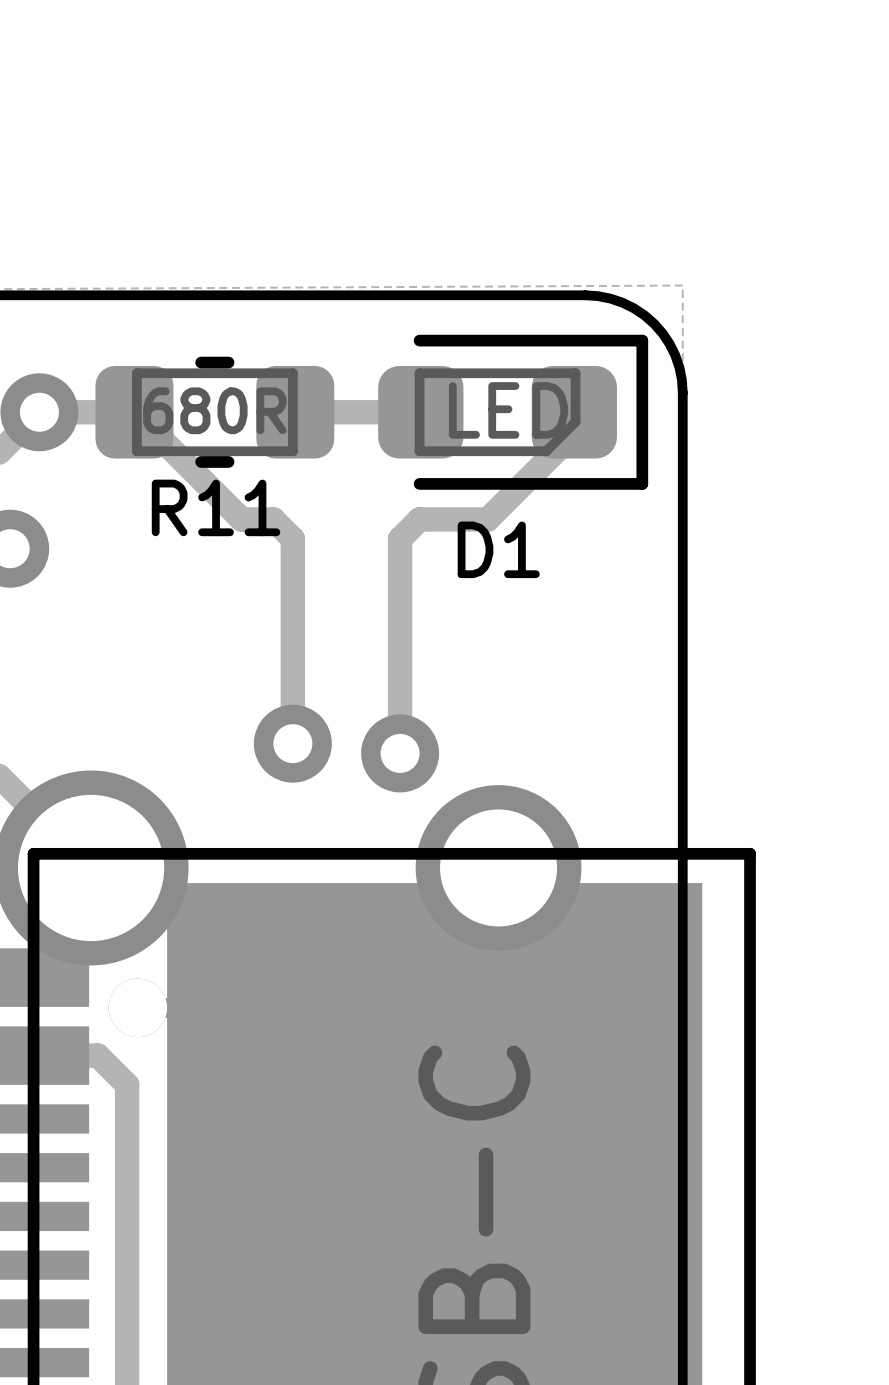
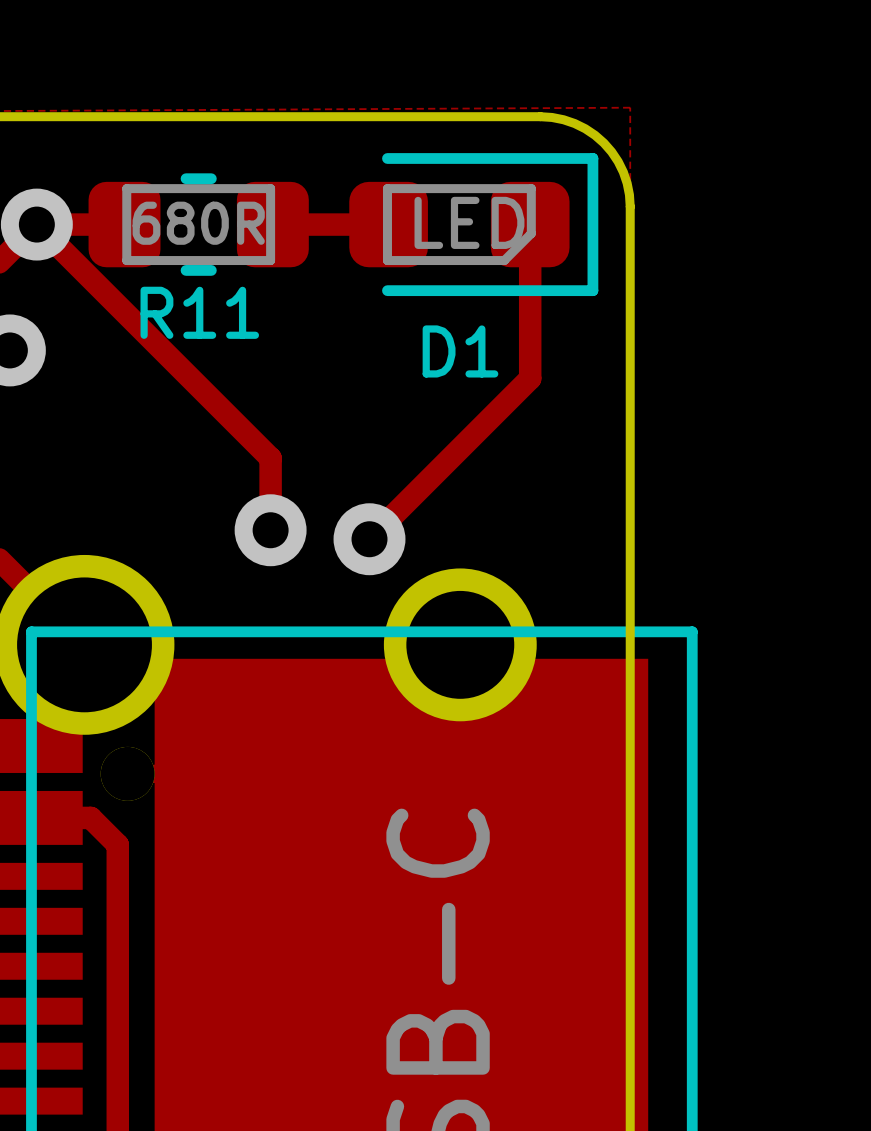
track: (134, 412) (241, 519) (273, 519) (292, 538) (292, 665) -> (36, 224) (270, 458)
track: (574, 432) (487, 519) (419, 519) (400, 538) (400, 753) -> (530, 243) (530, 378) (369, 539)

